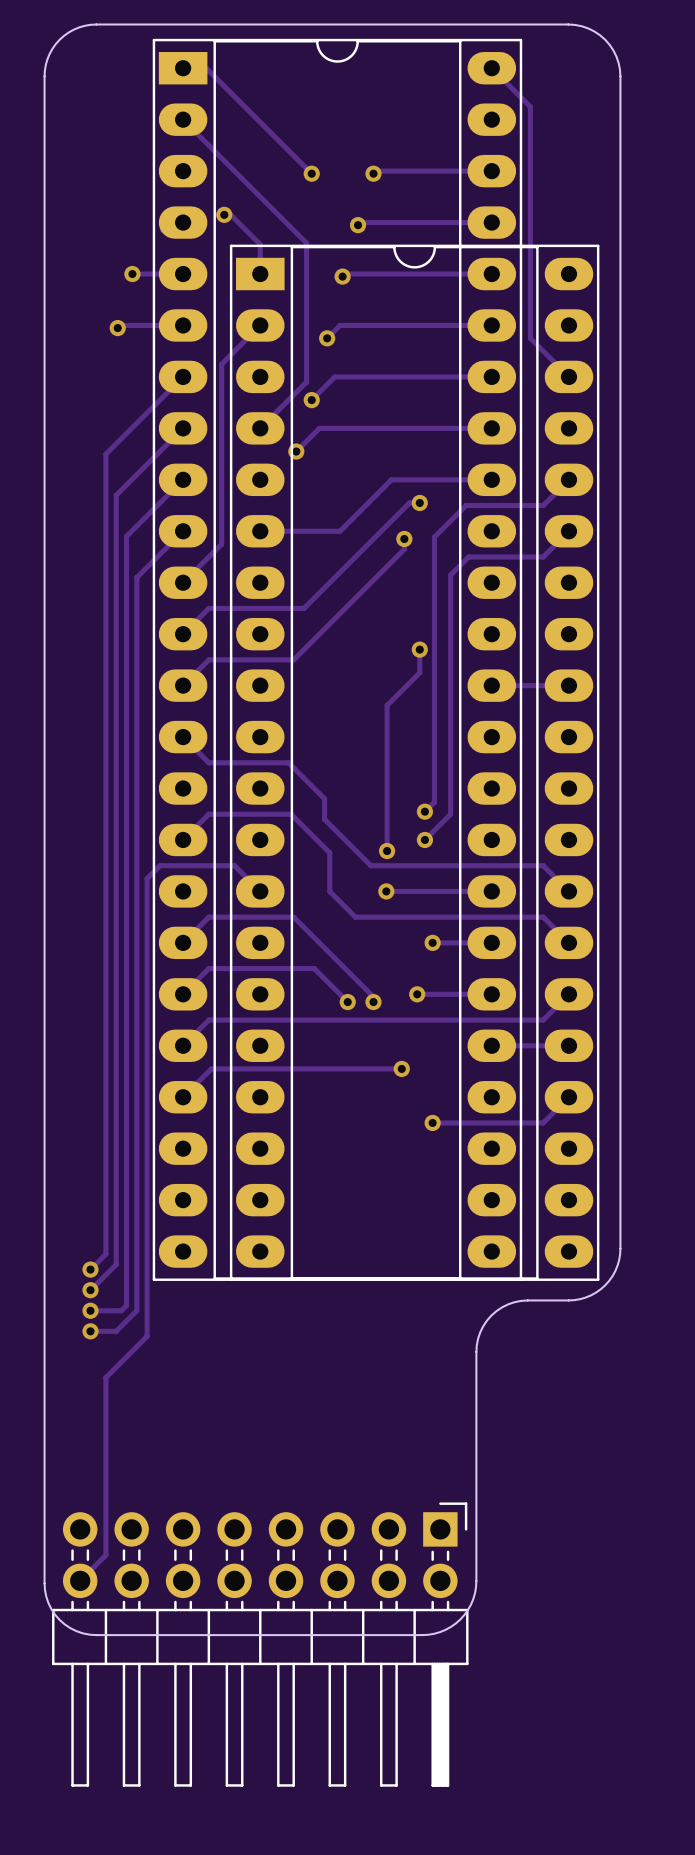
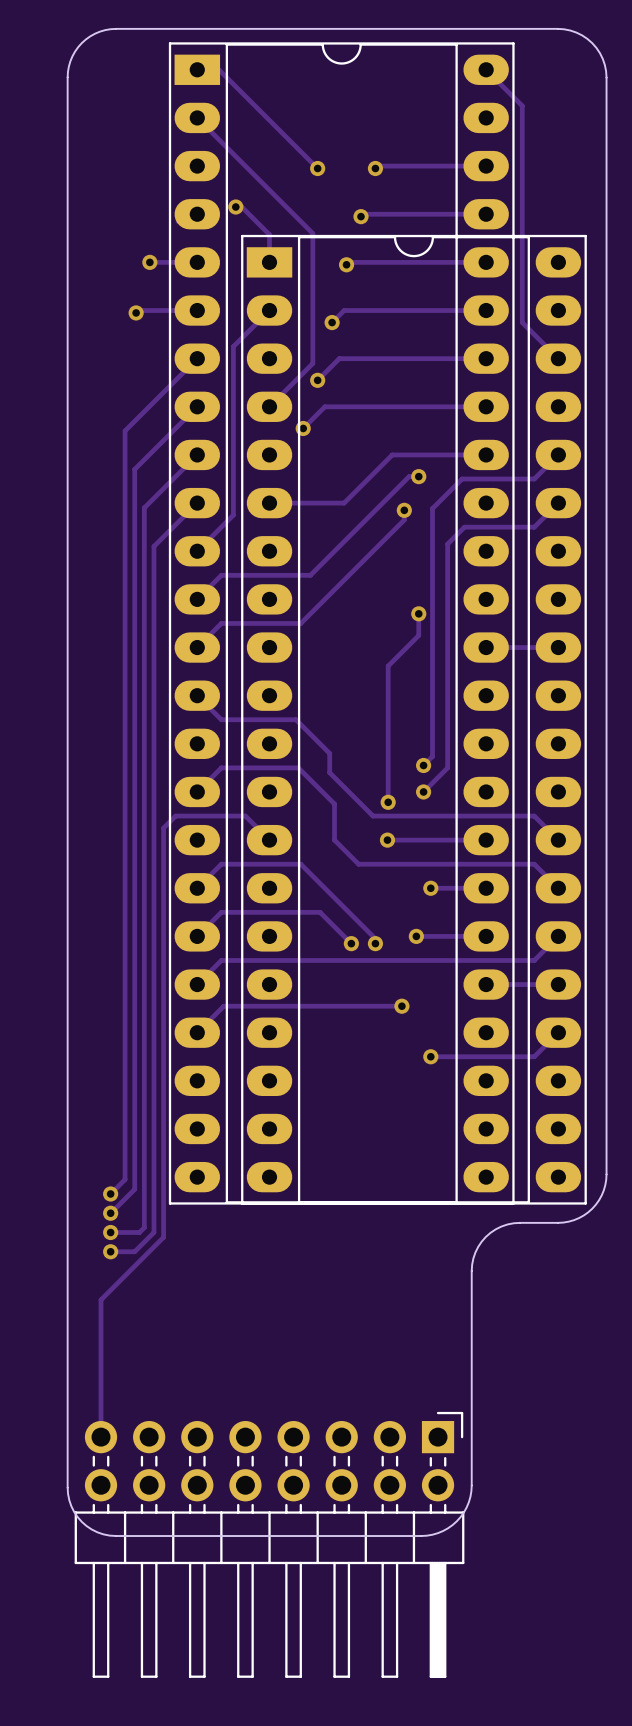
track: (147, 1315) (147, 1336) (105, 1377) (105, 1555) (80, 1580) -> (163, 1237) (101, 1299) (101, 1437)

